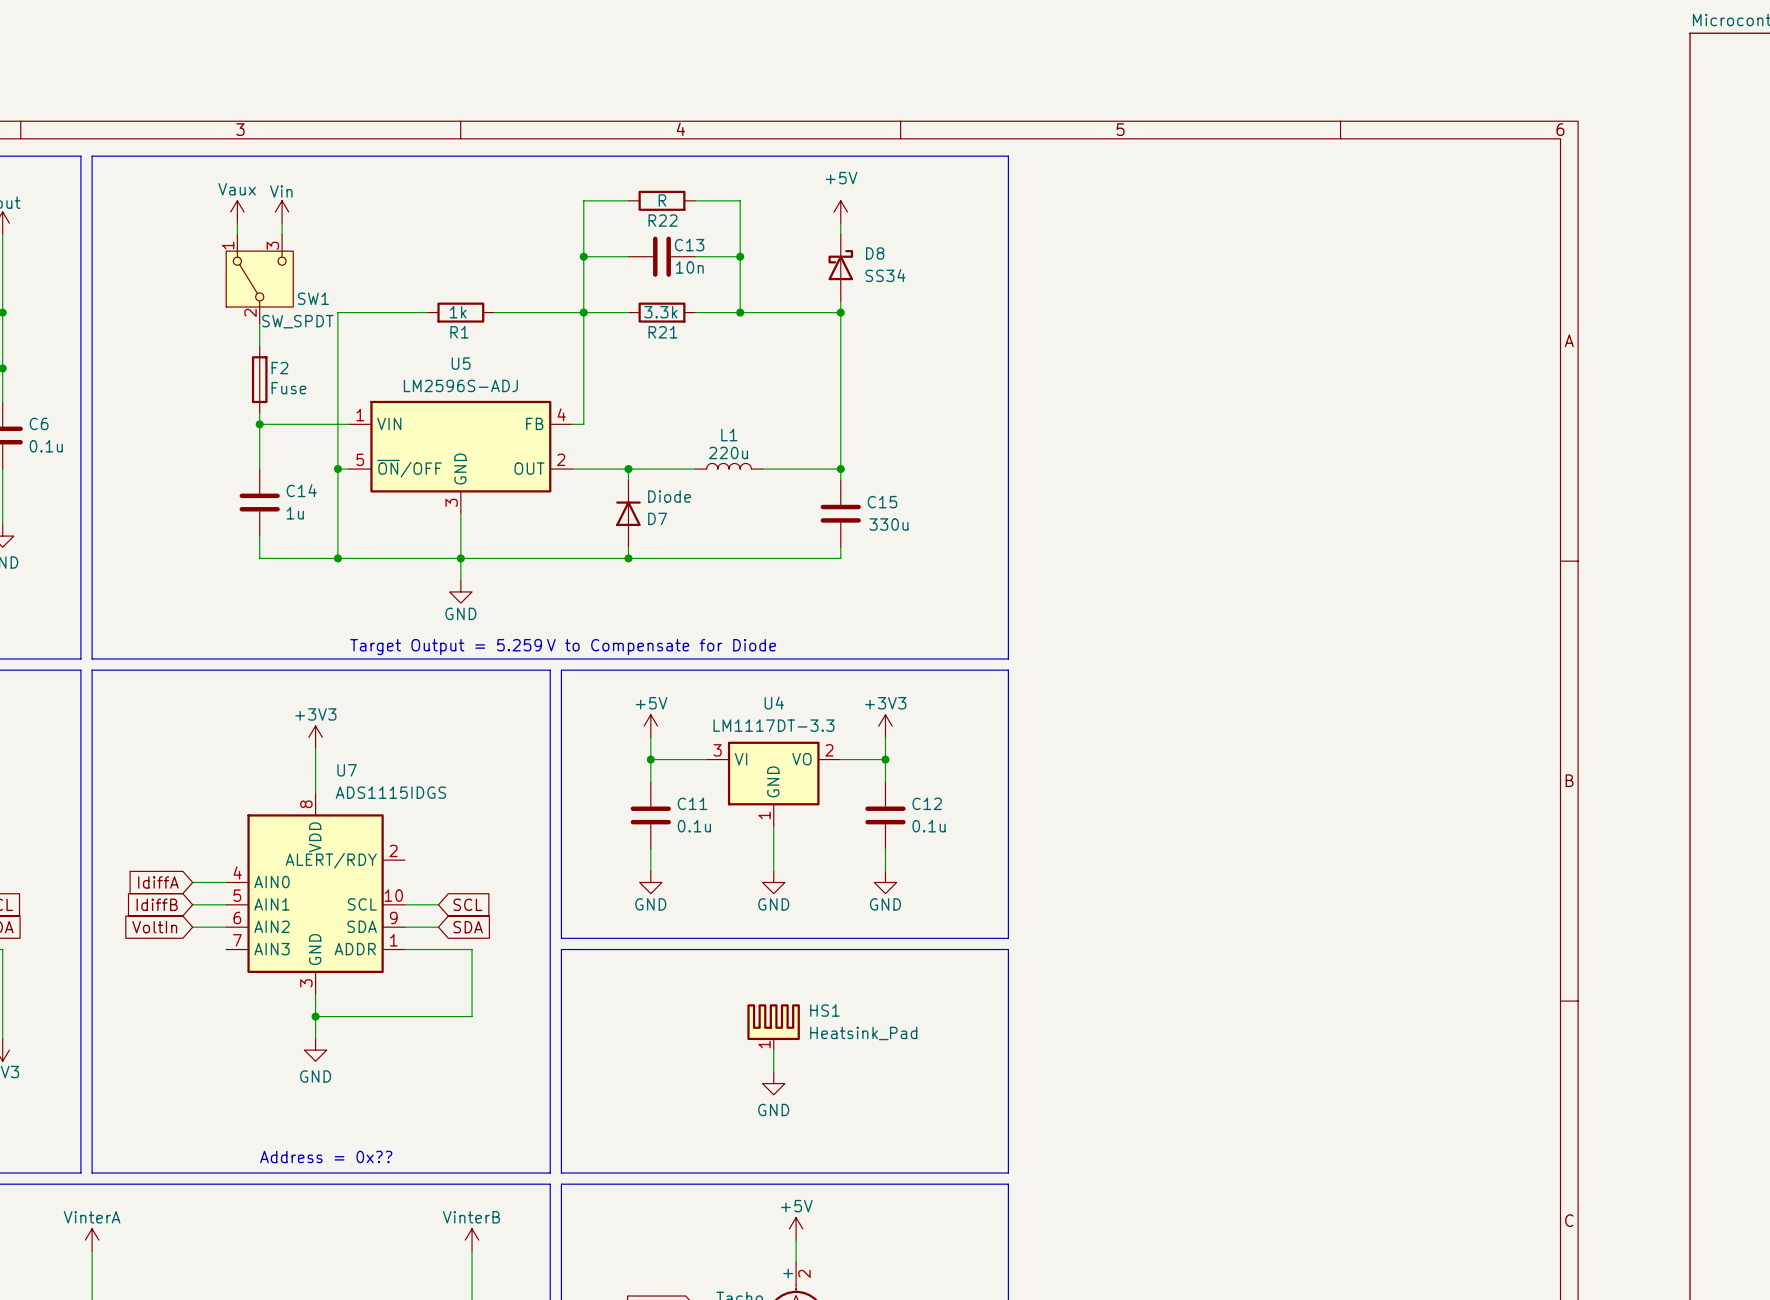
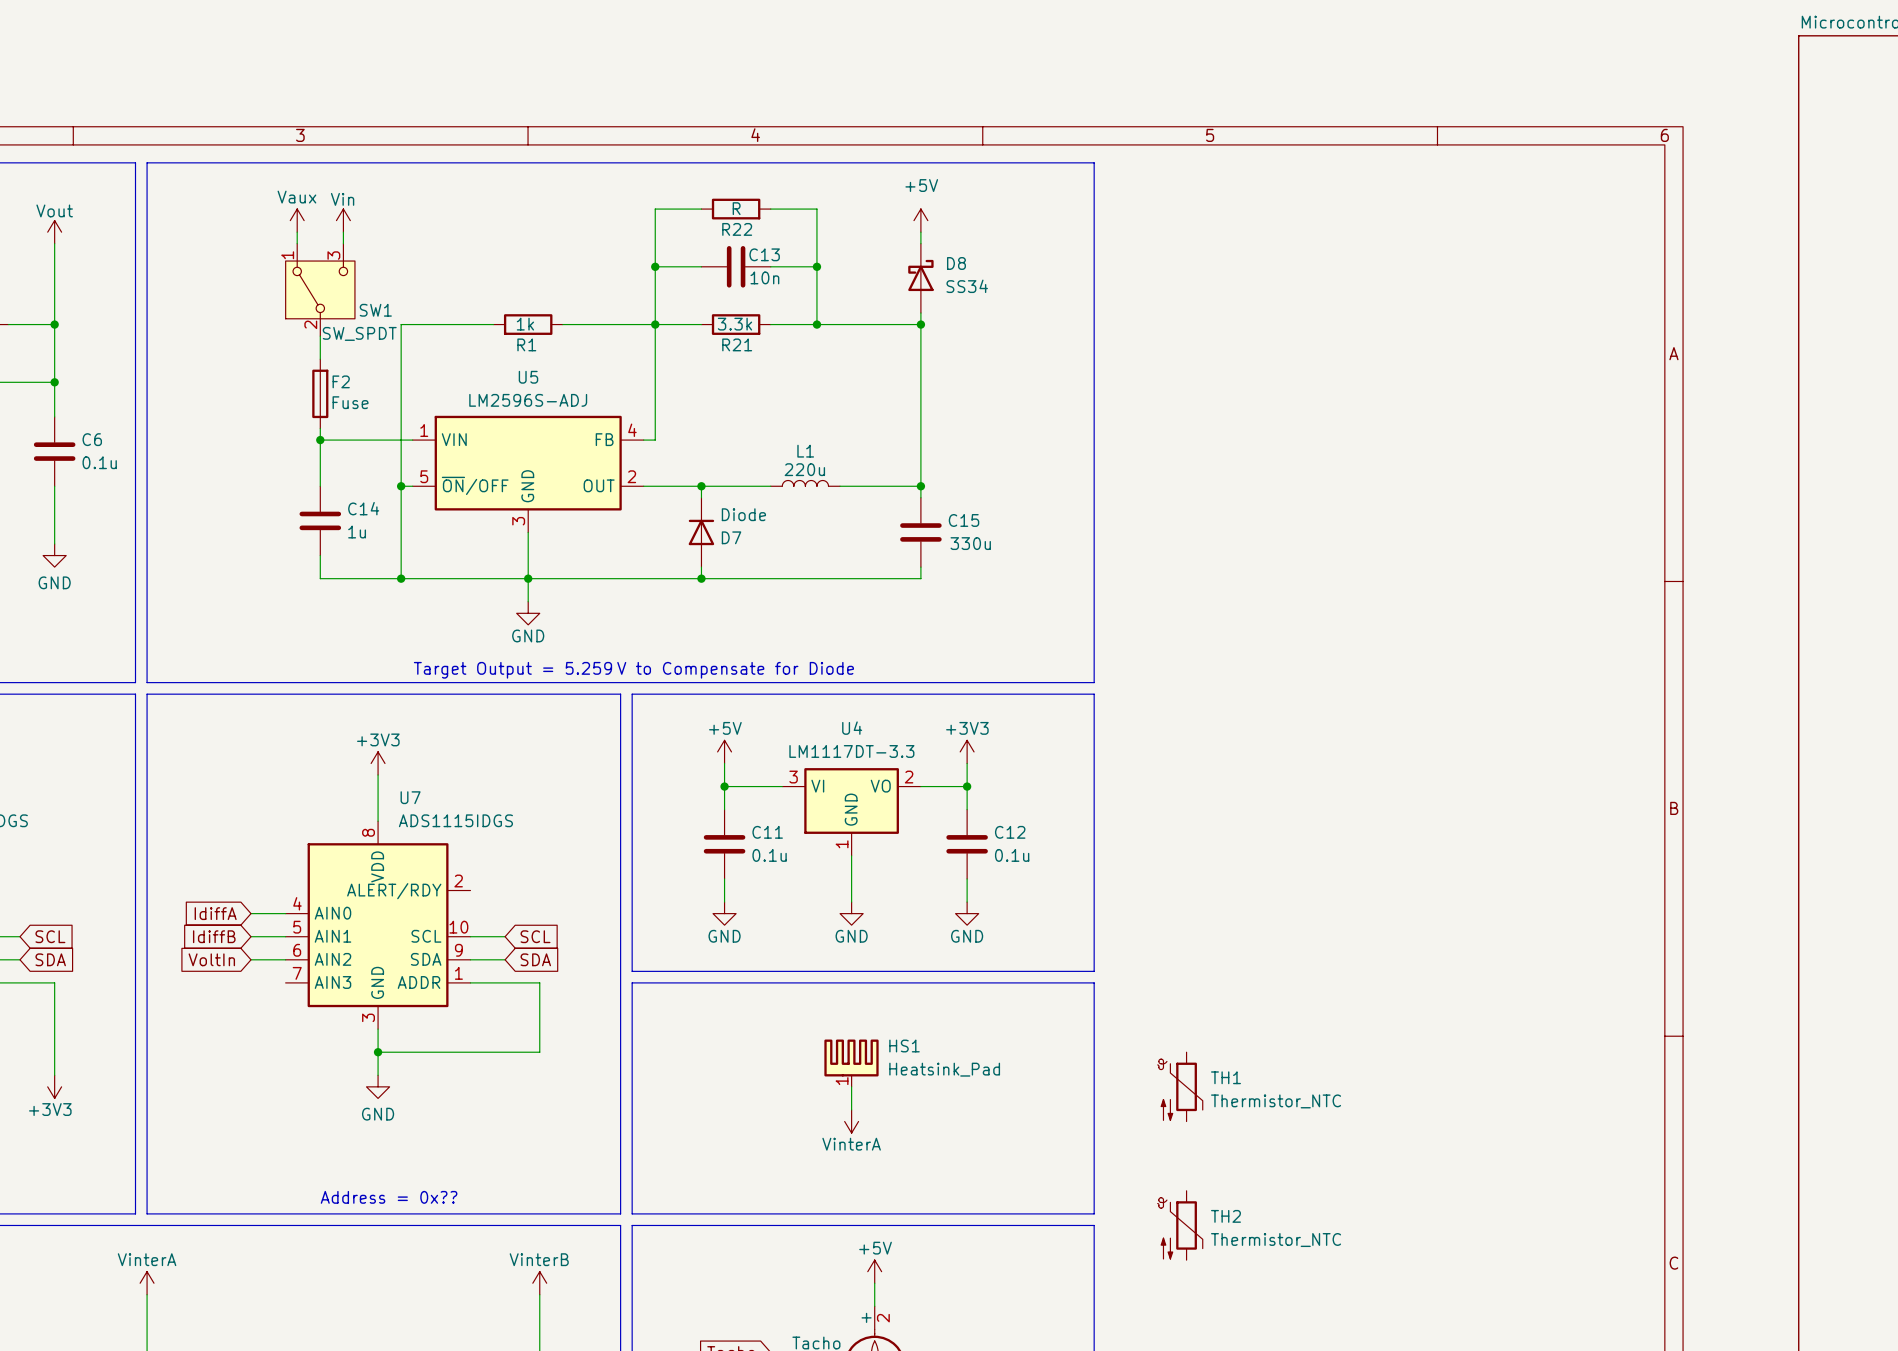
TH1: none -> Thermistor_NTC (1180, 1086)
power symbol: GND (773, 1083) -> VinterA (851, 1121)
TH2: none -> Thermistor_NTC (1180, 1225)

